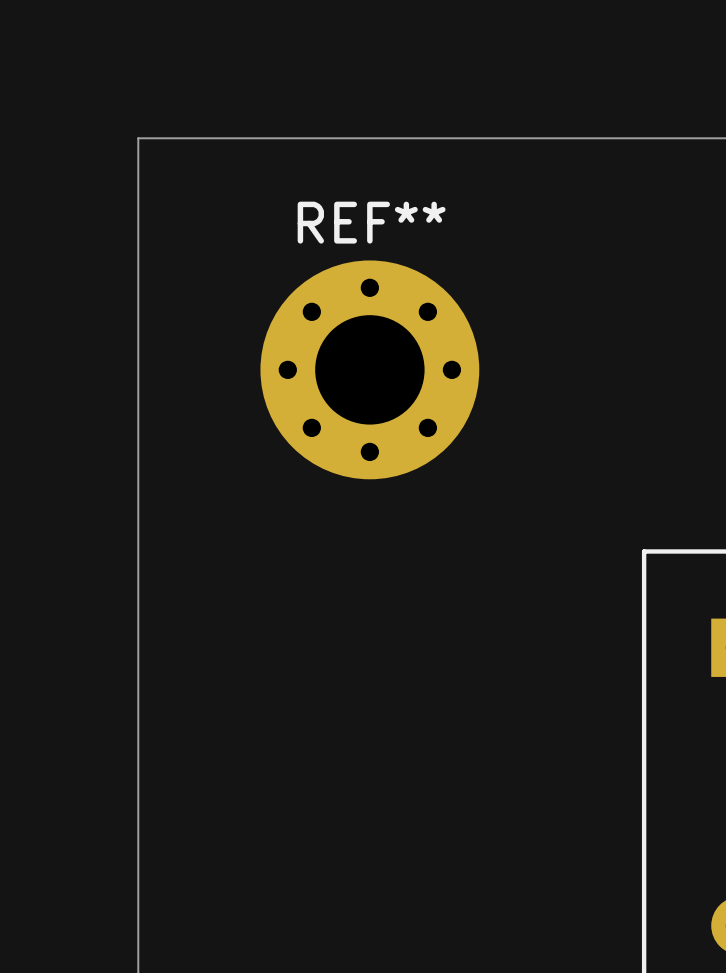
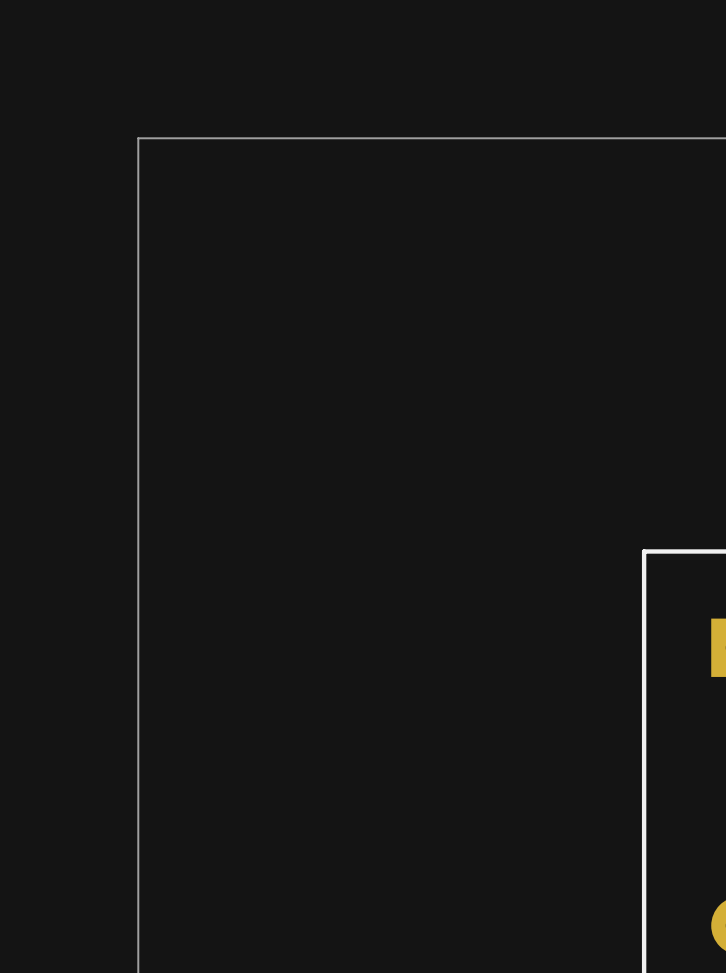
REF**: (369, 369) -> none

